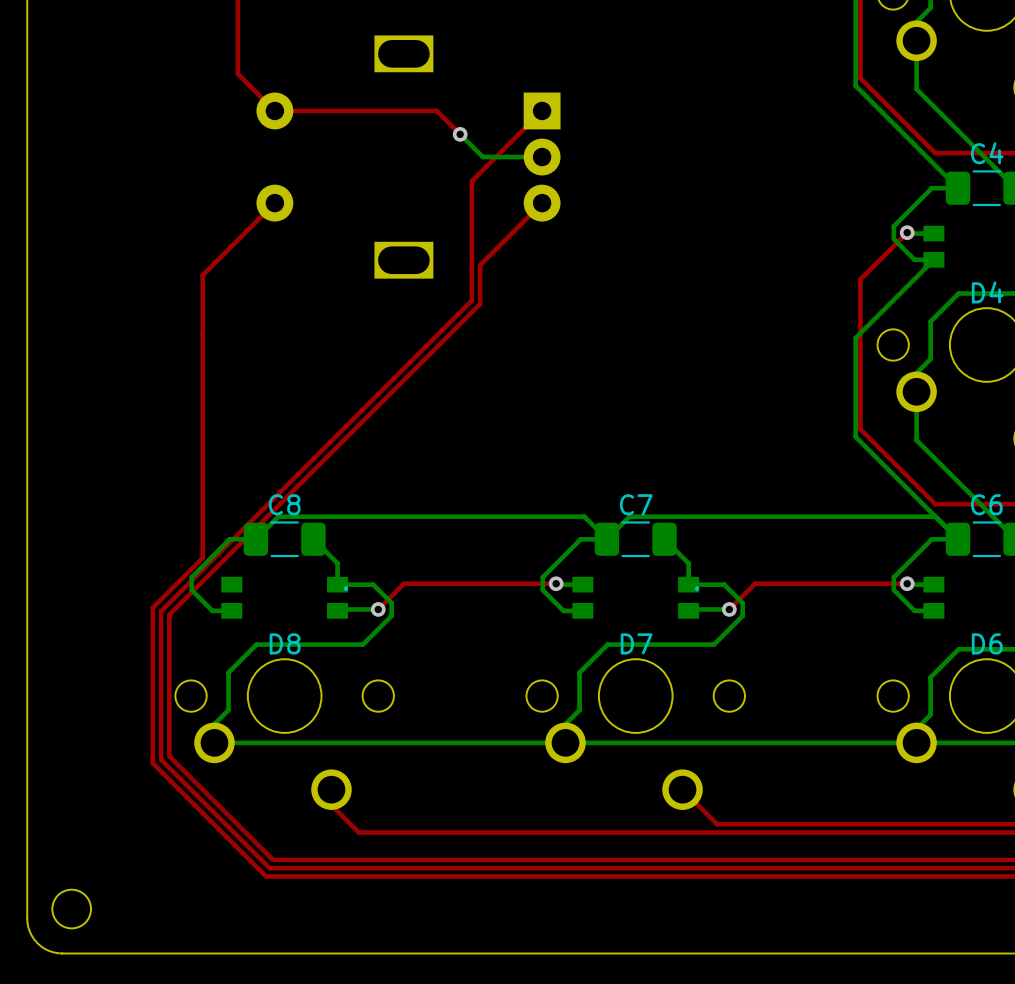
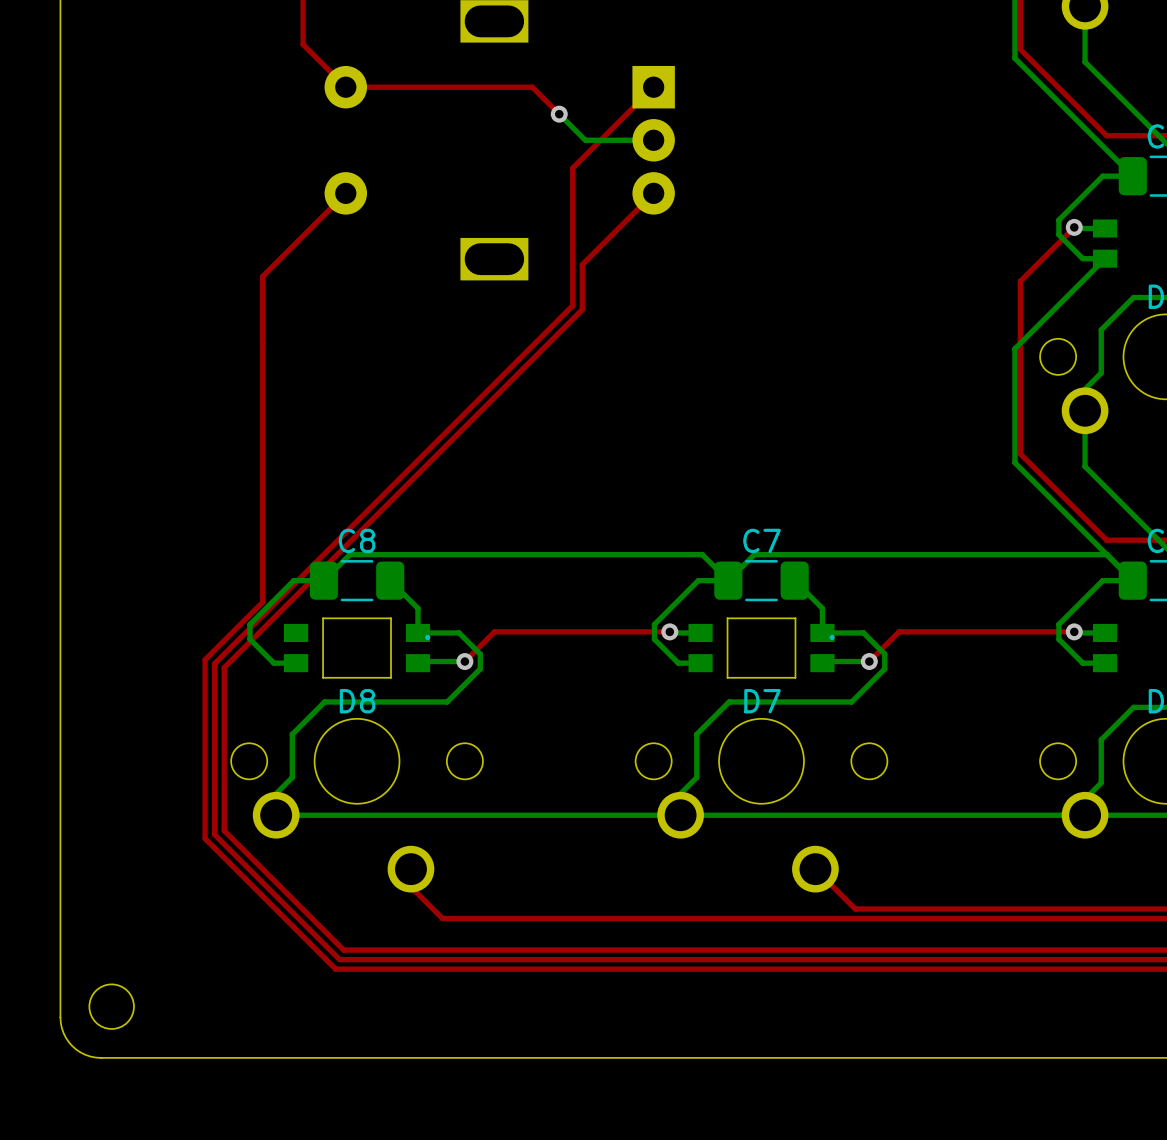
board edge: none -> (391, 618) (323, 618) (323, 677) (391, 677) (391, 618)
board edge: none -> (795, 618) (727, 618) (727, 677) (795, 677) (795, 618)

